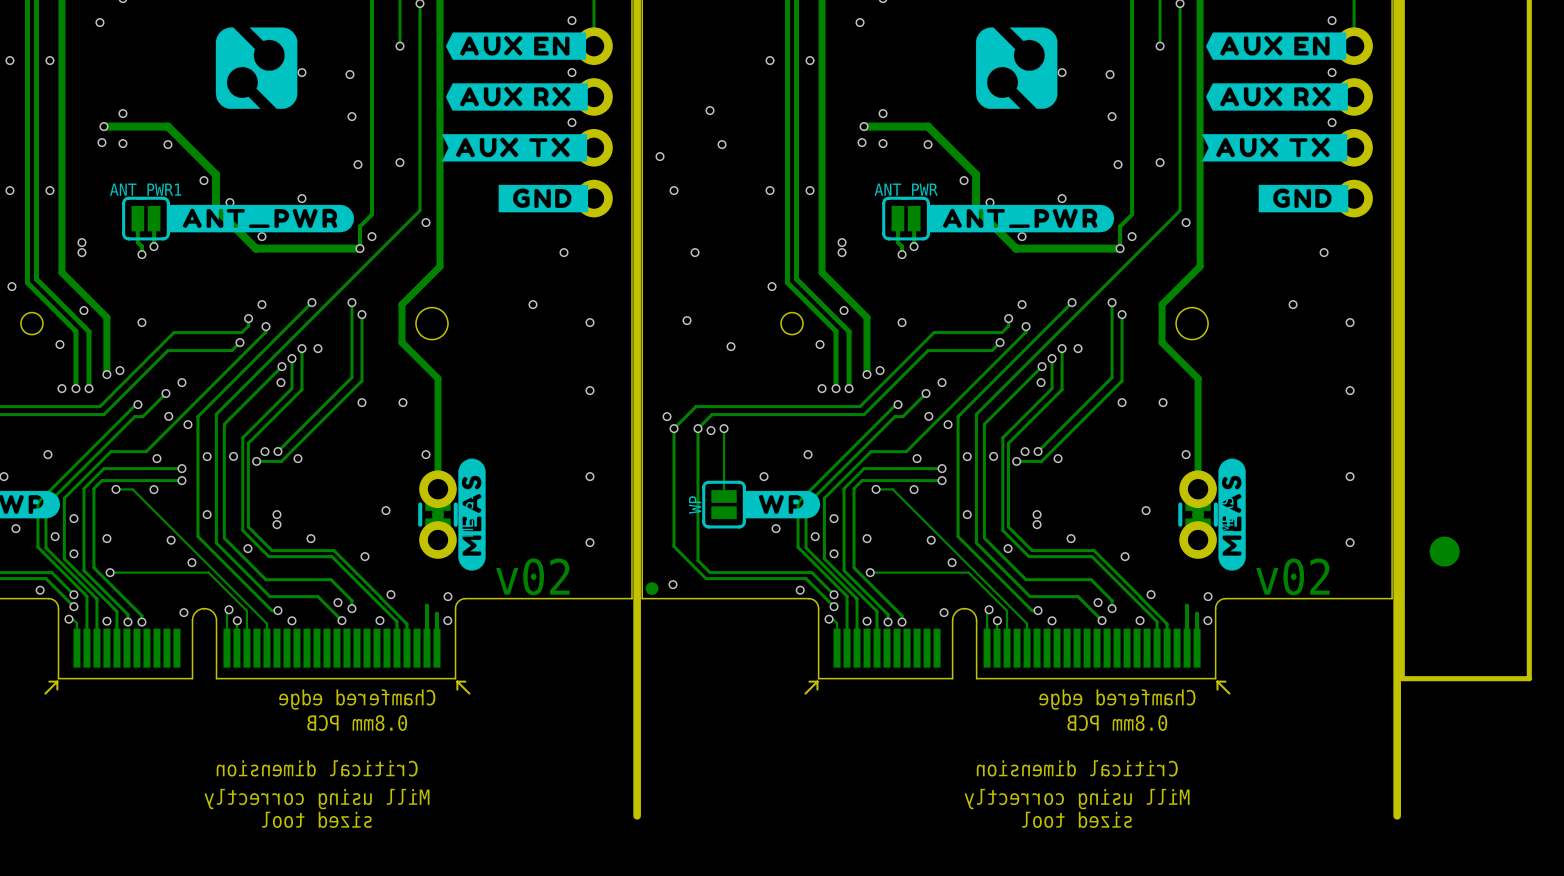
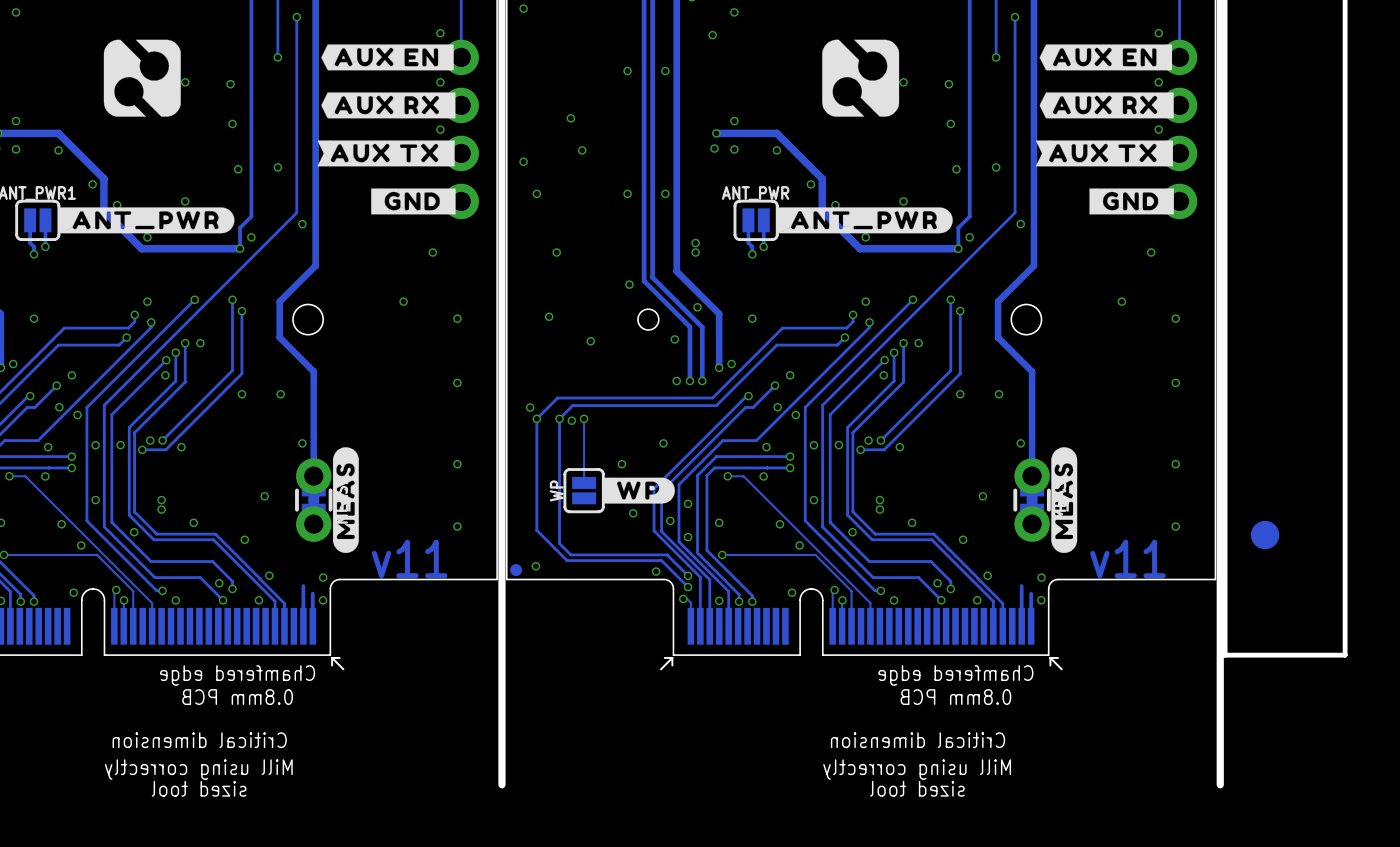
text: v02 (532, 576) -> v11 (409, 558)
text: v02 (1292, 576) -> v11 (1127, 558)

